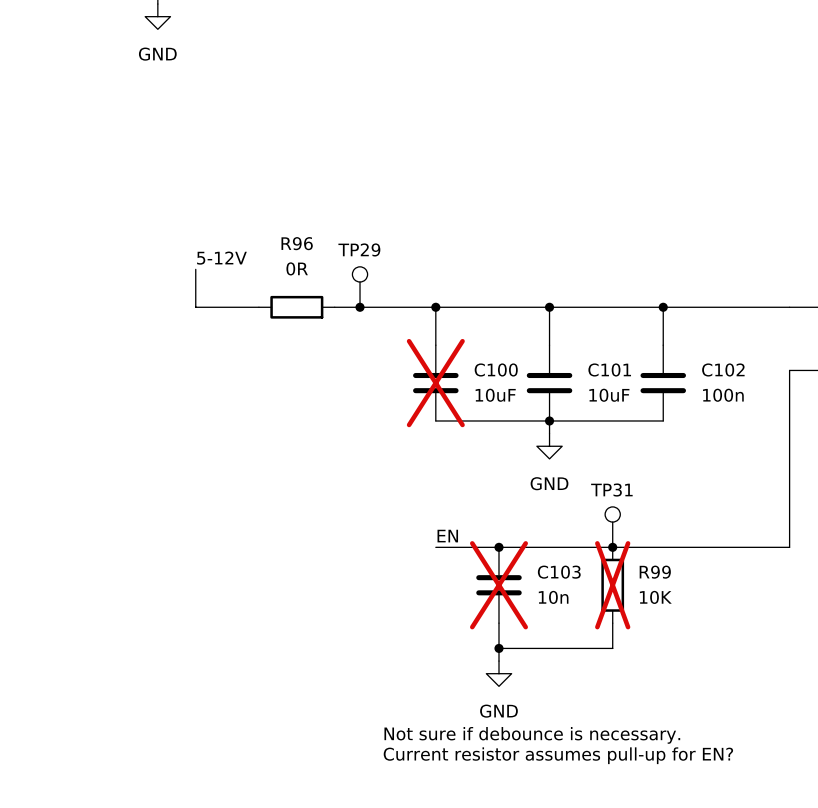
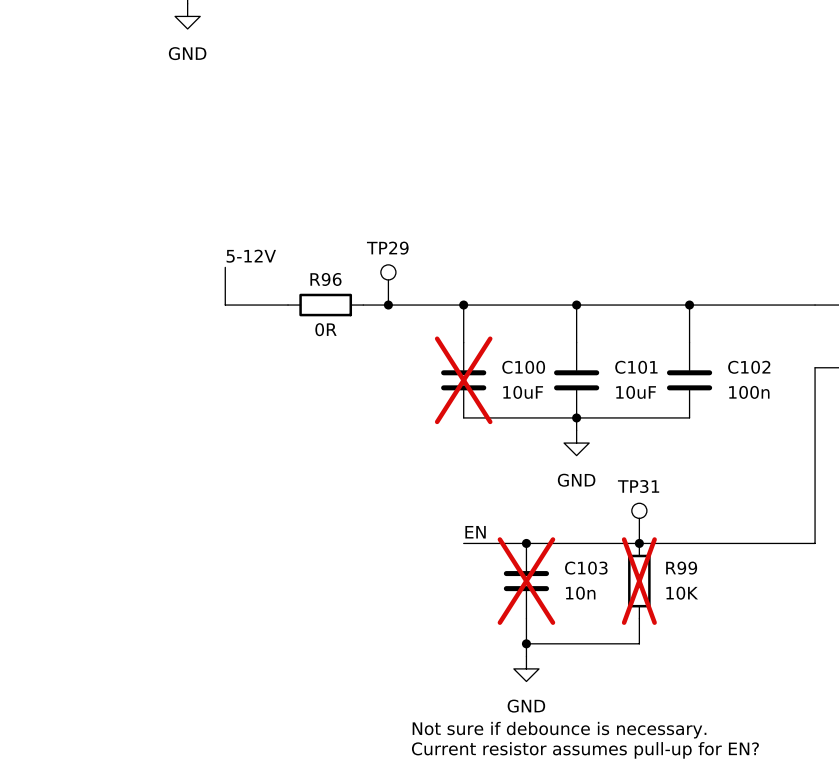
R96 name position: R96 (297, 243) -> R96 (325, 279)
R96 value position: 0R (297, 268) -> 0R (325, 329)

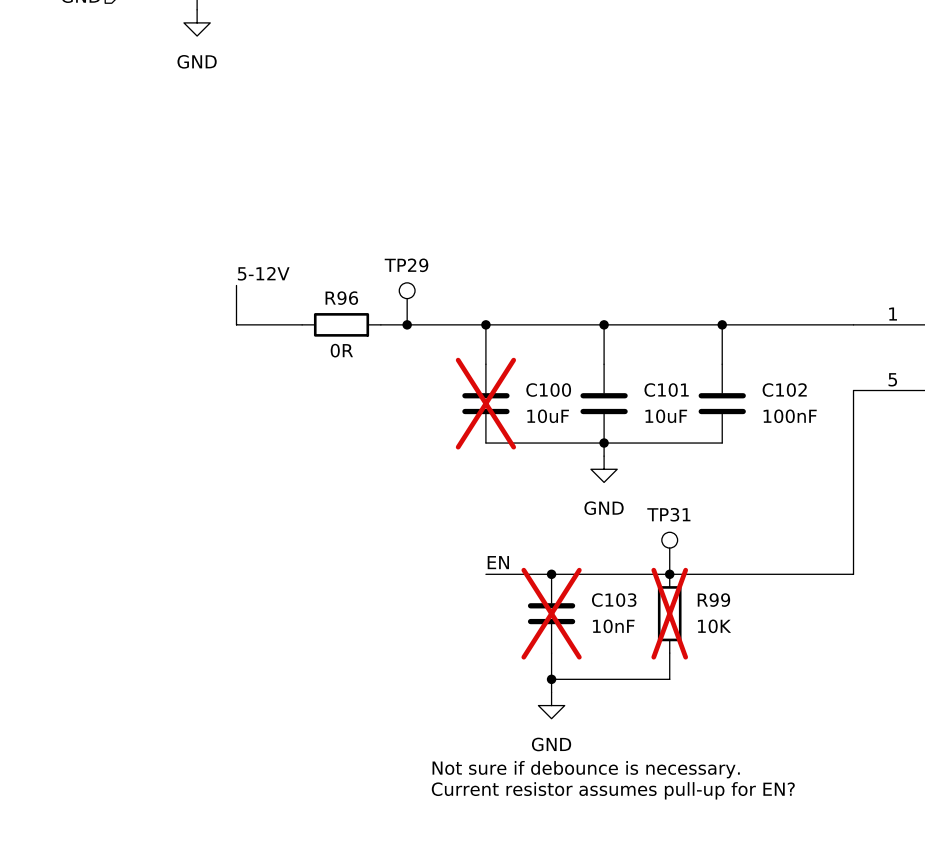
C102 value: 100n (749, 392) -> 100nF (790, 416)
C103 value: 10n (580, 593) -> 10nF (613, 626)

